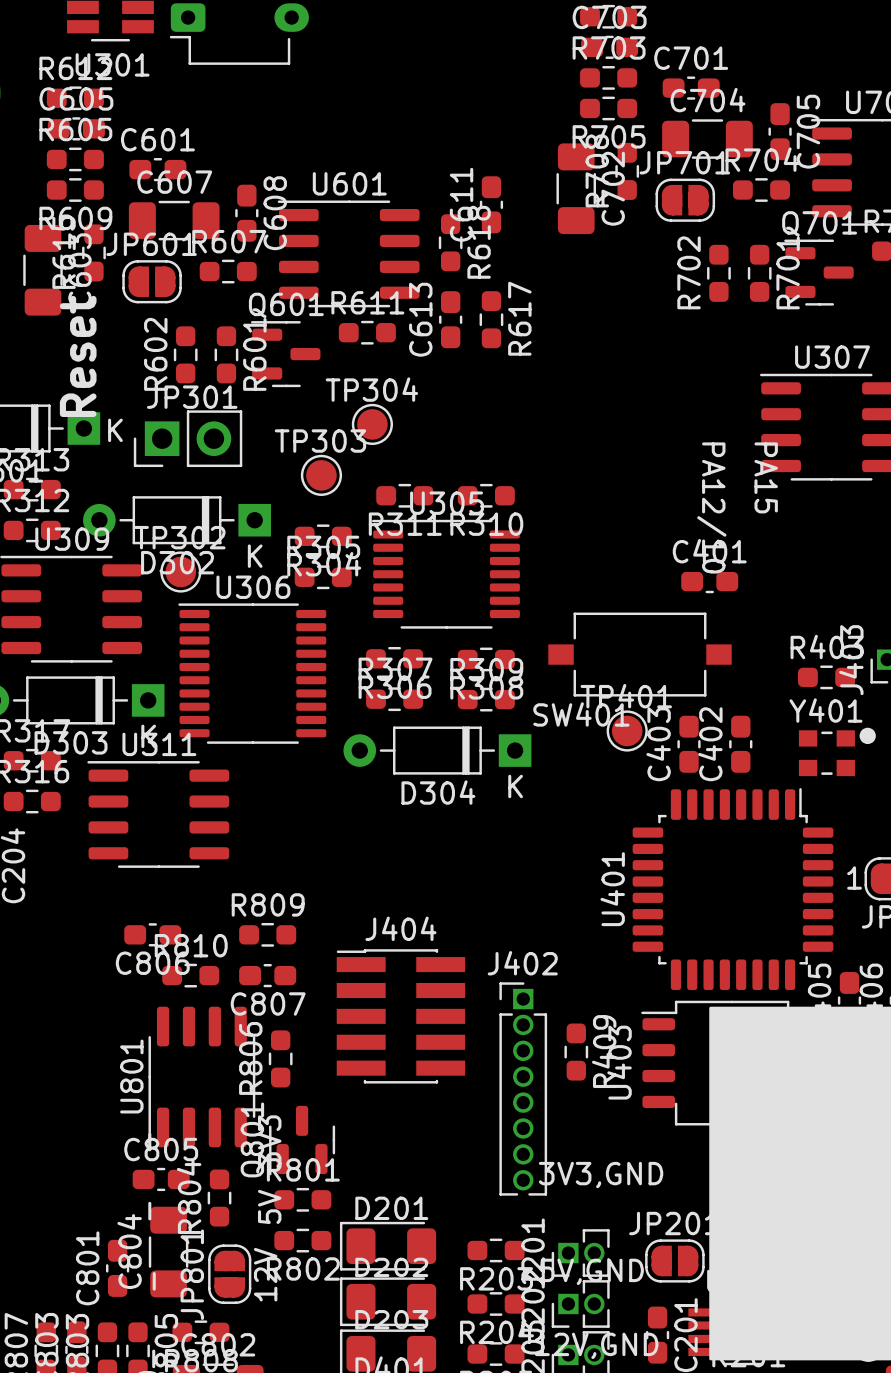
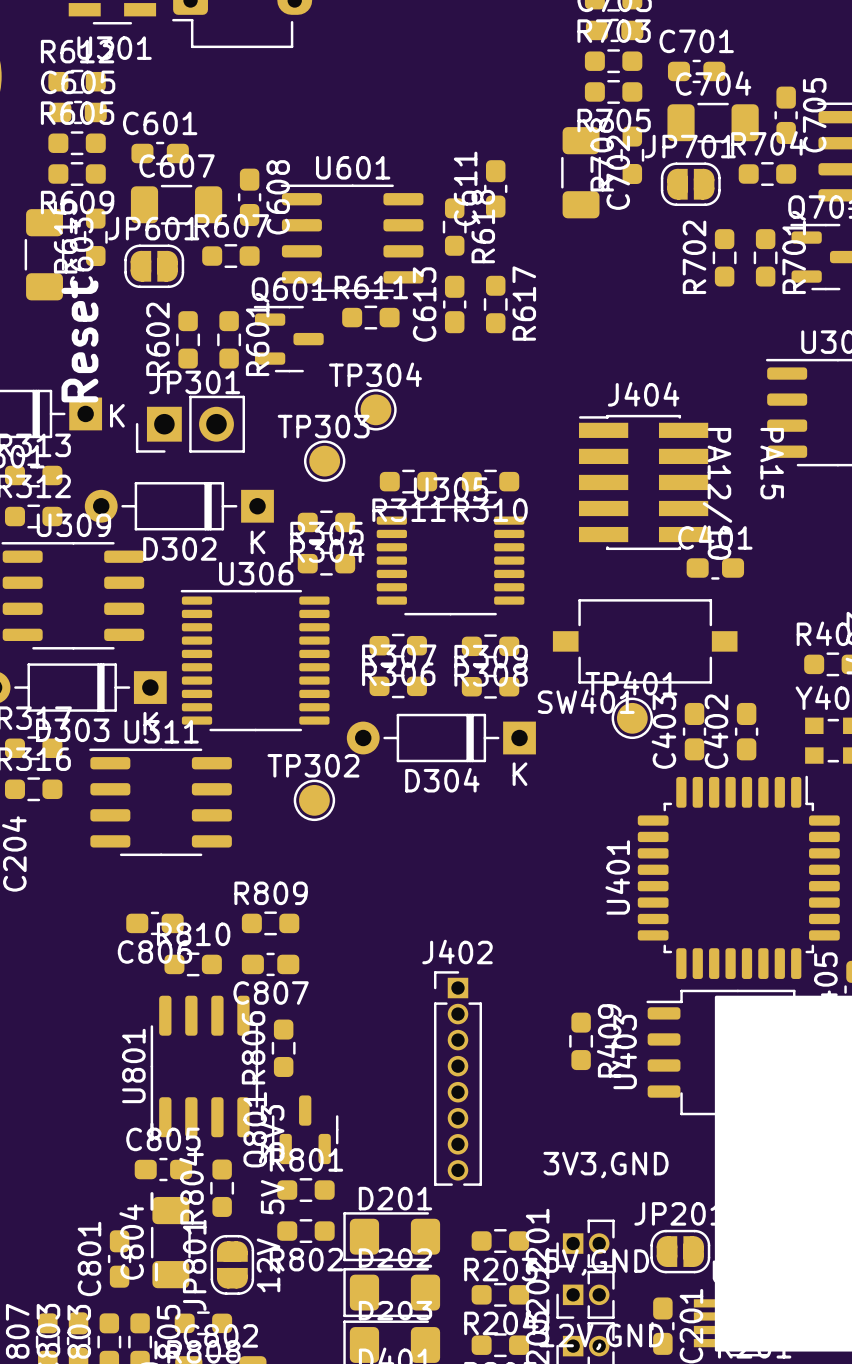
TP302 position: (180, 572) -> (314, 800)
J404 position: (400, 1016) -> (643, 482)
J402 position: (523, 1088) -> (457, 1078)

